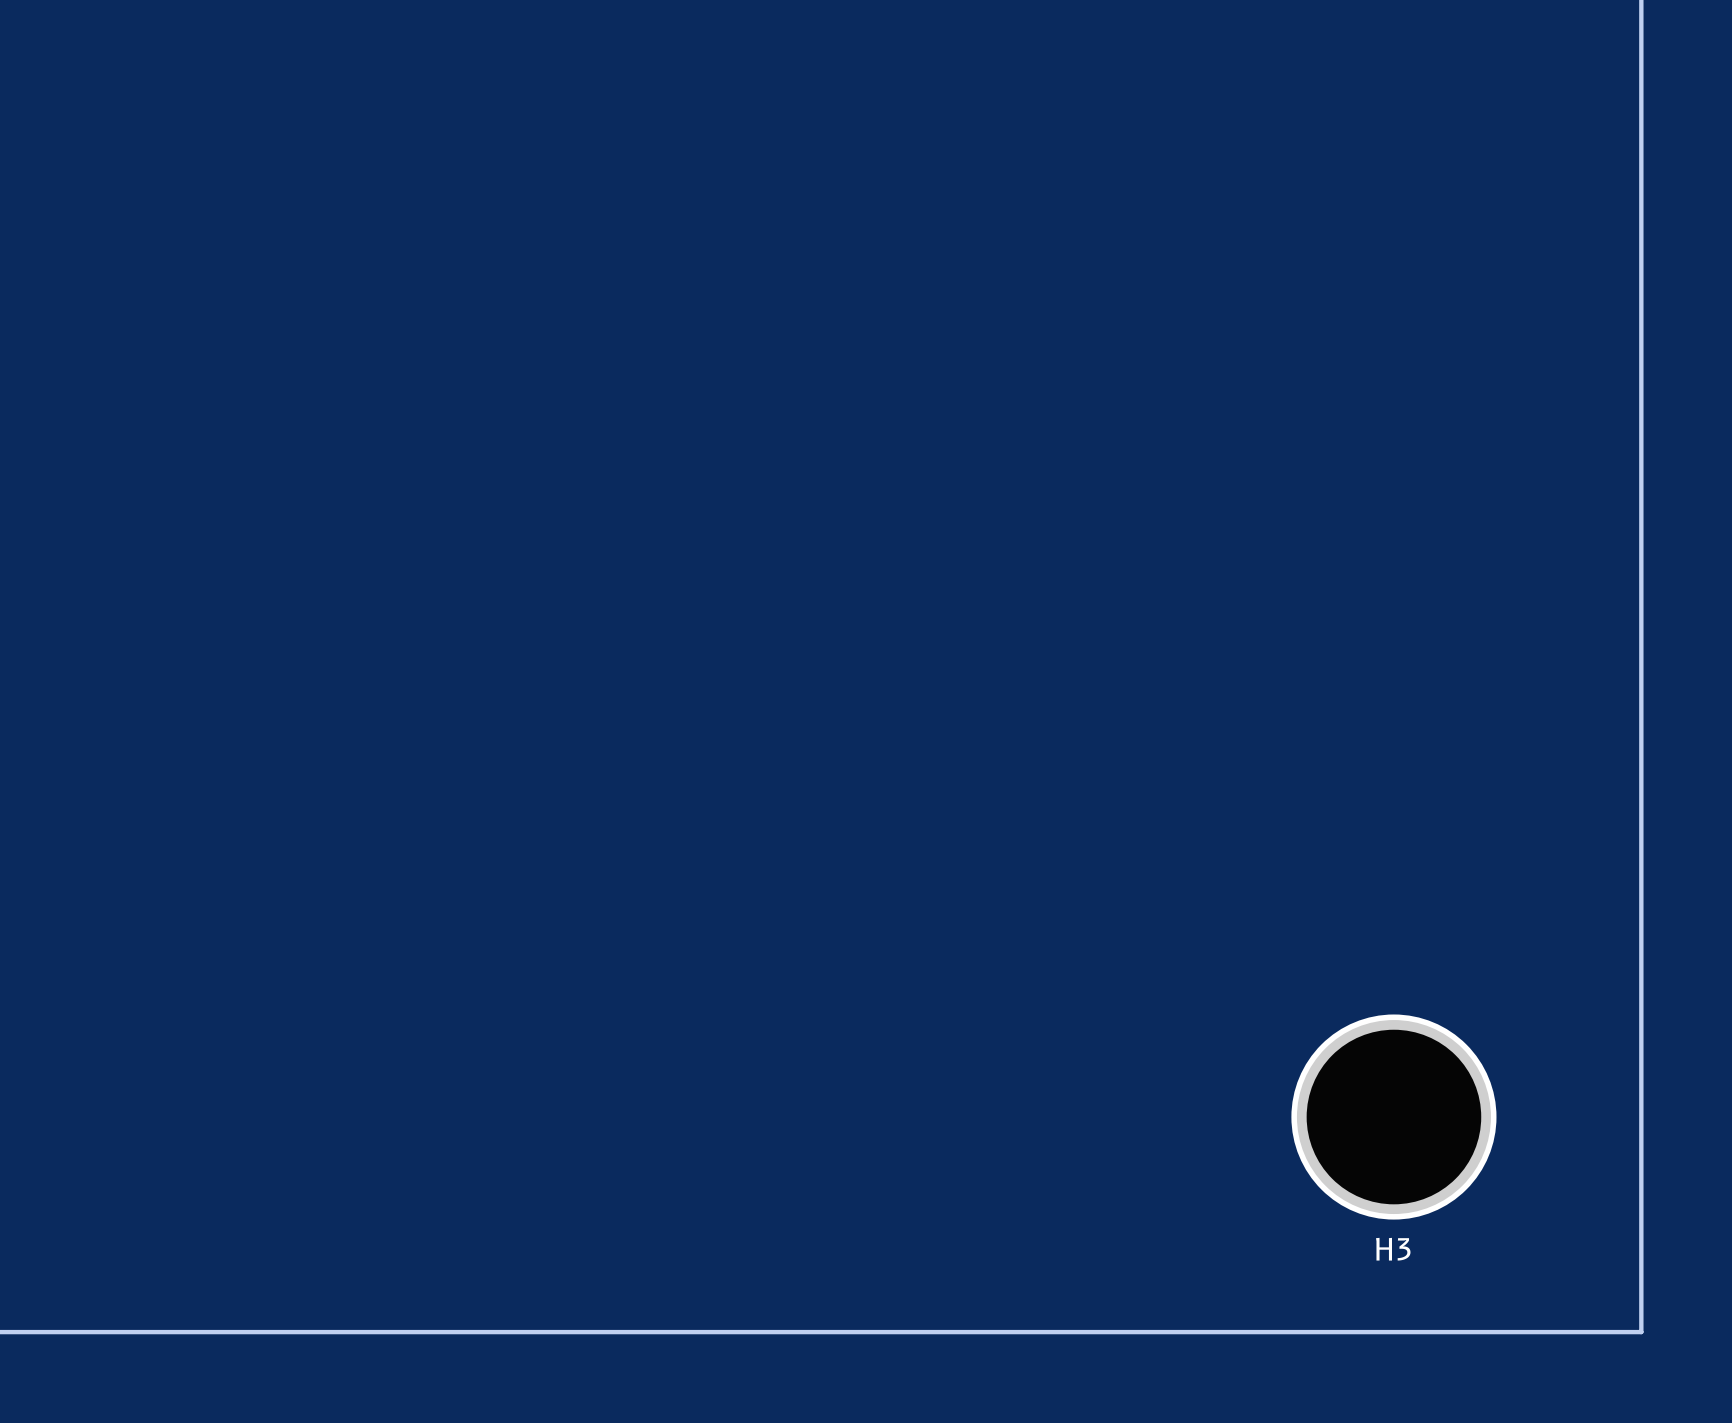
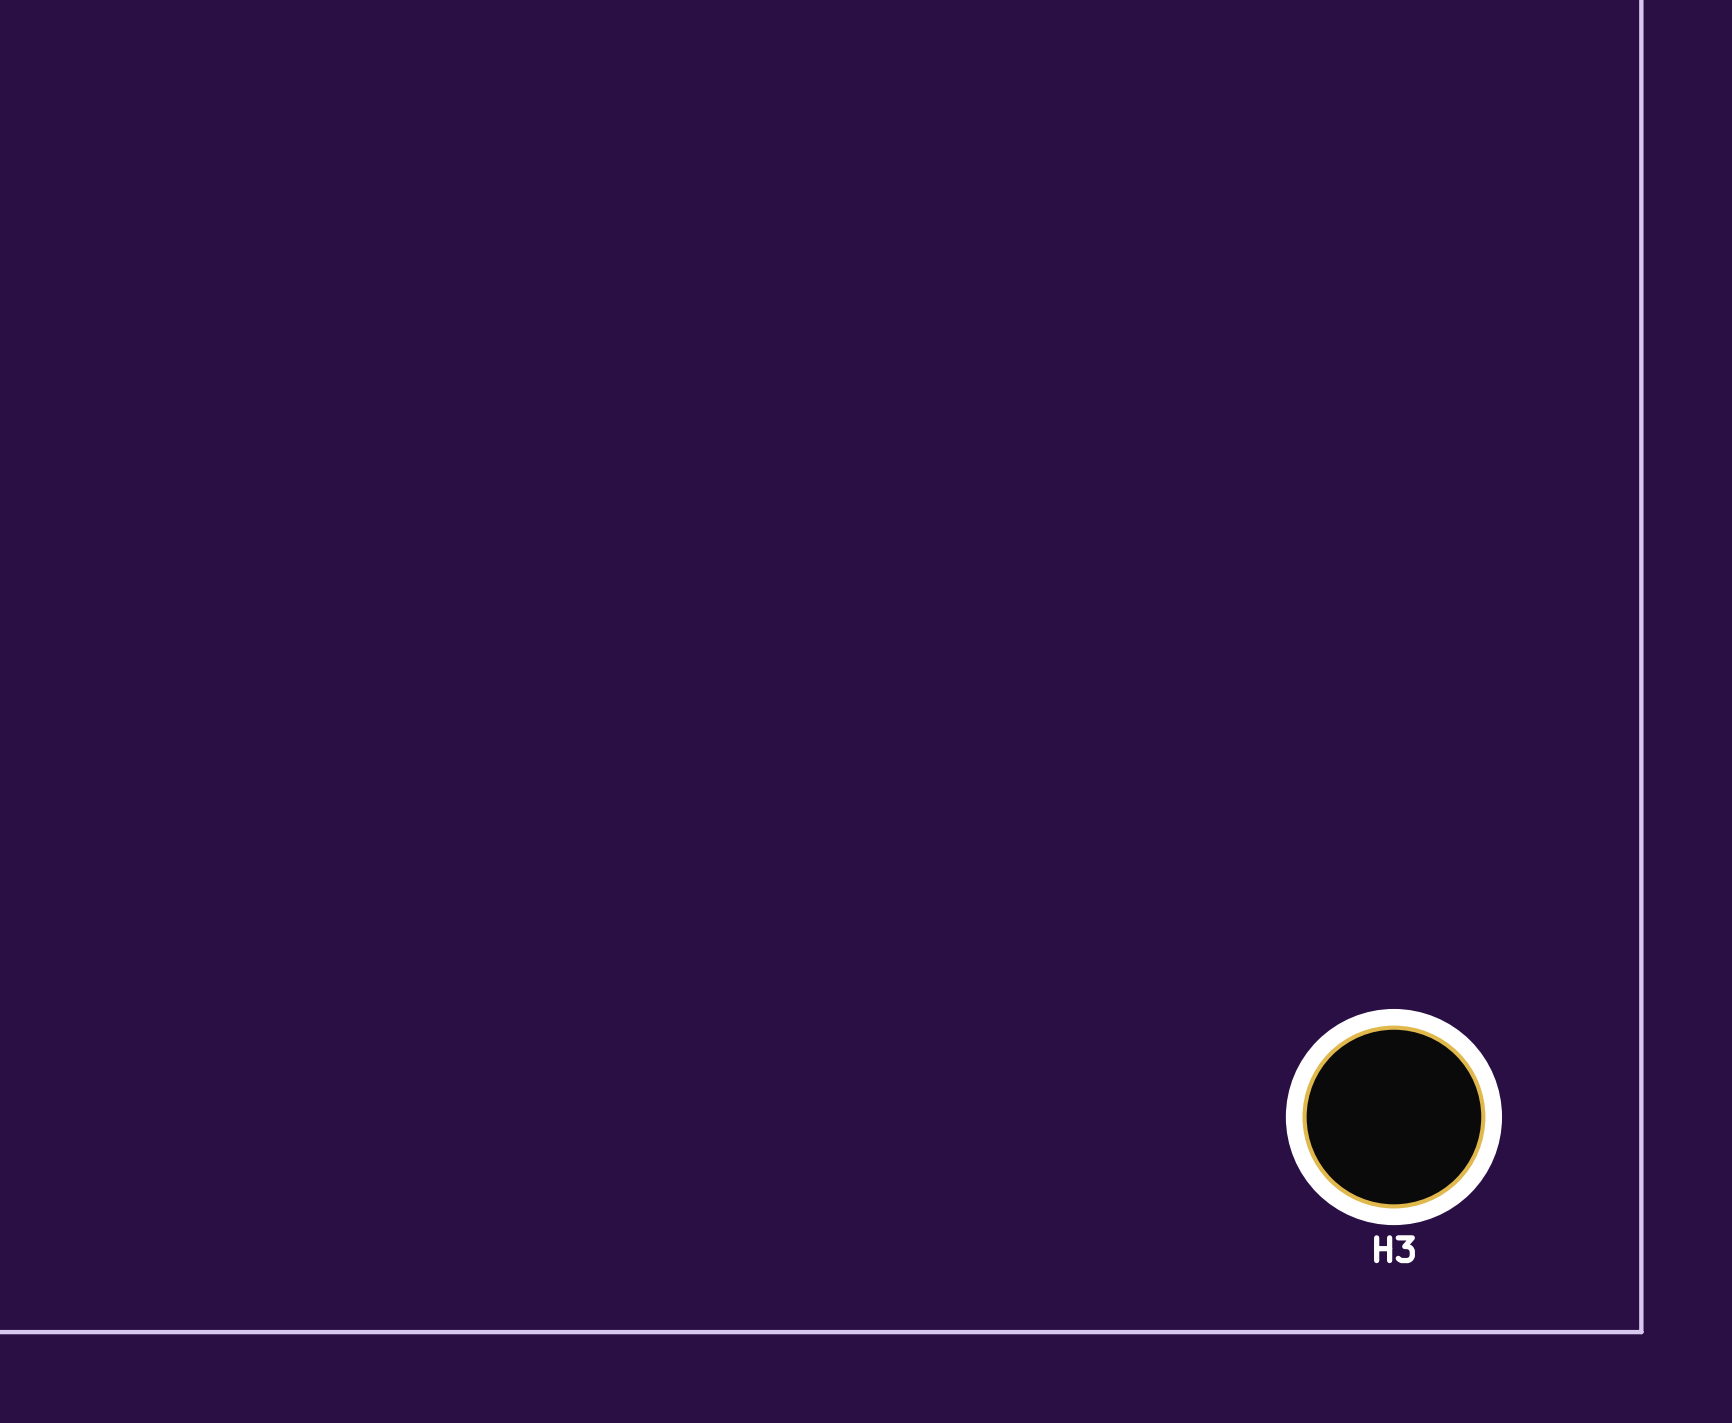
H3 footprint: [1291, 1014, 1497, 1220] -> [1285, 1008, 1503, 1226]

